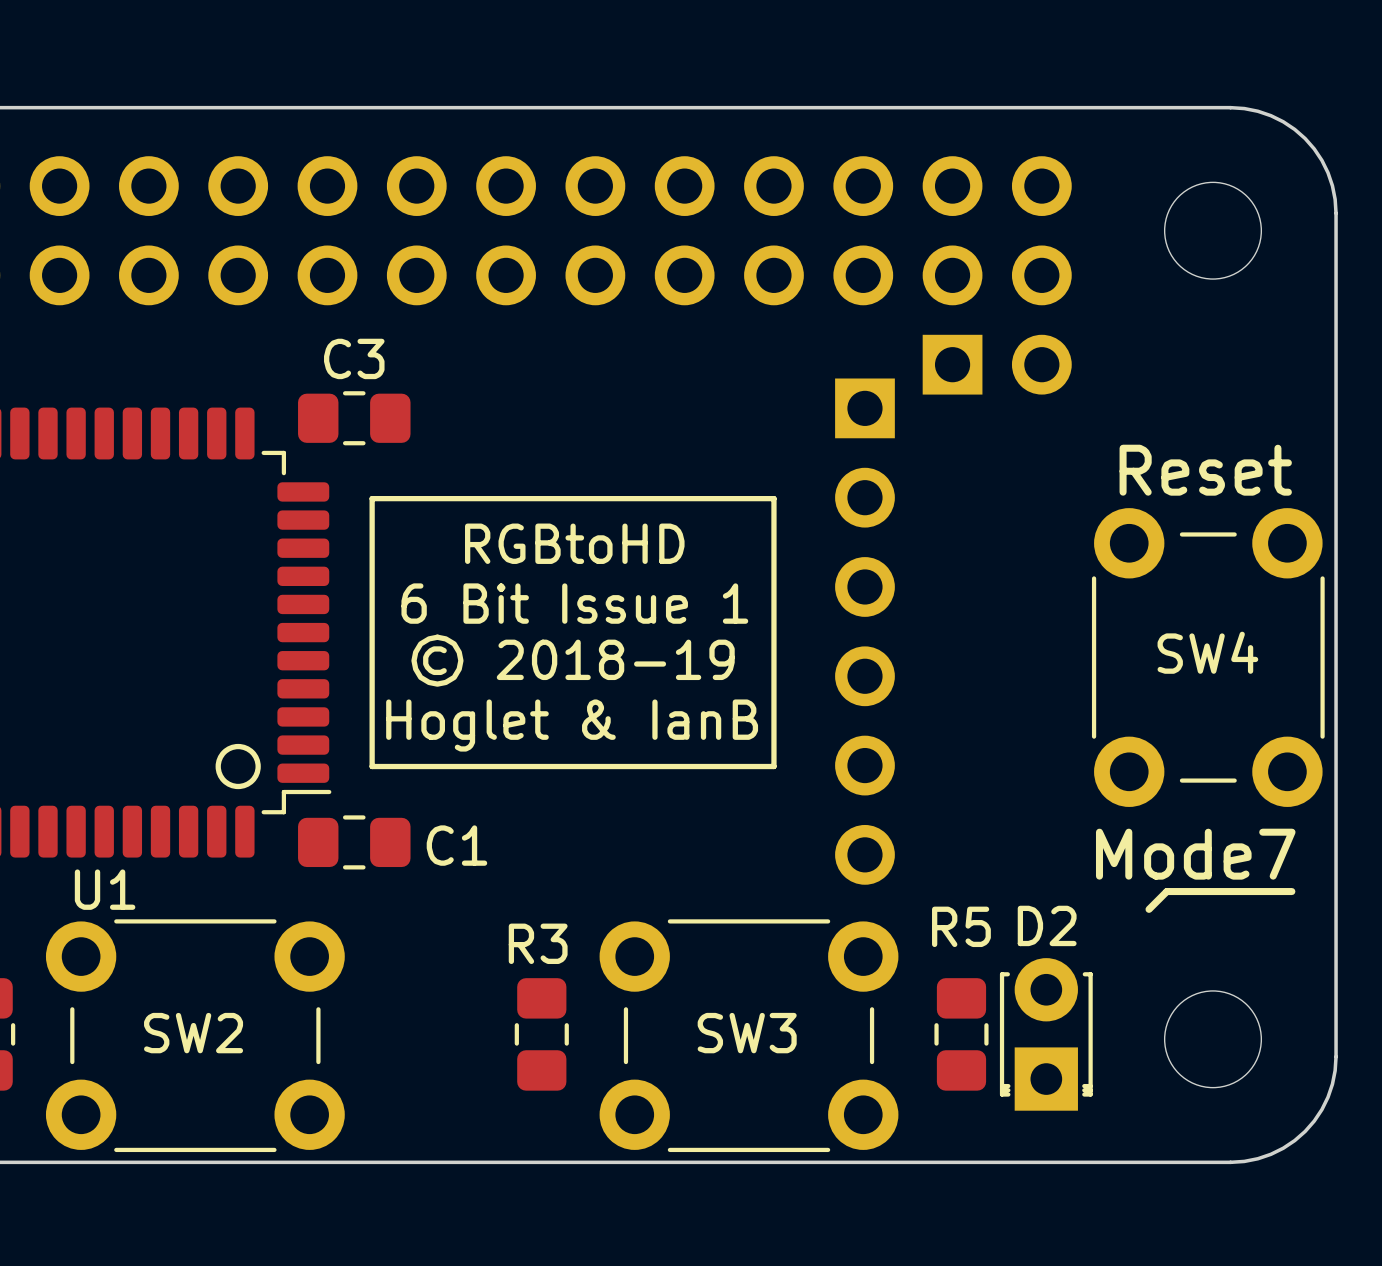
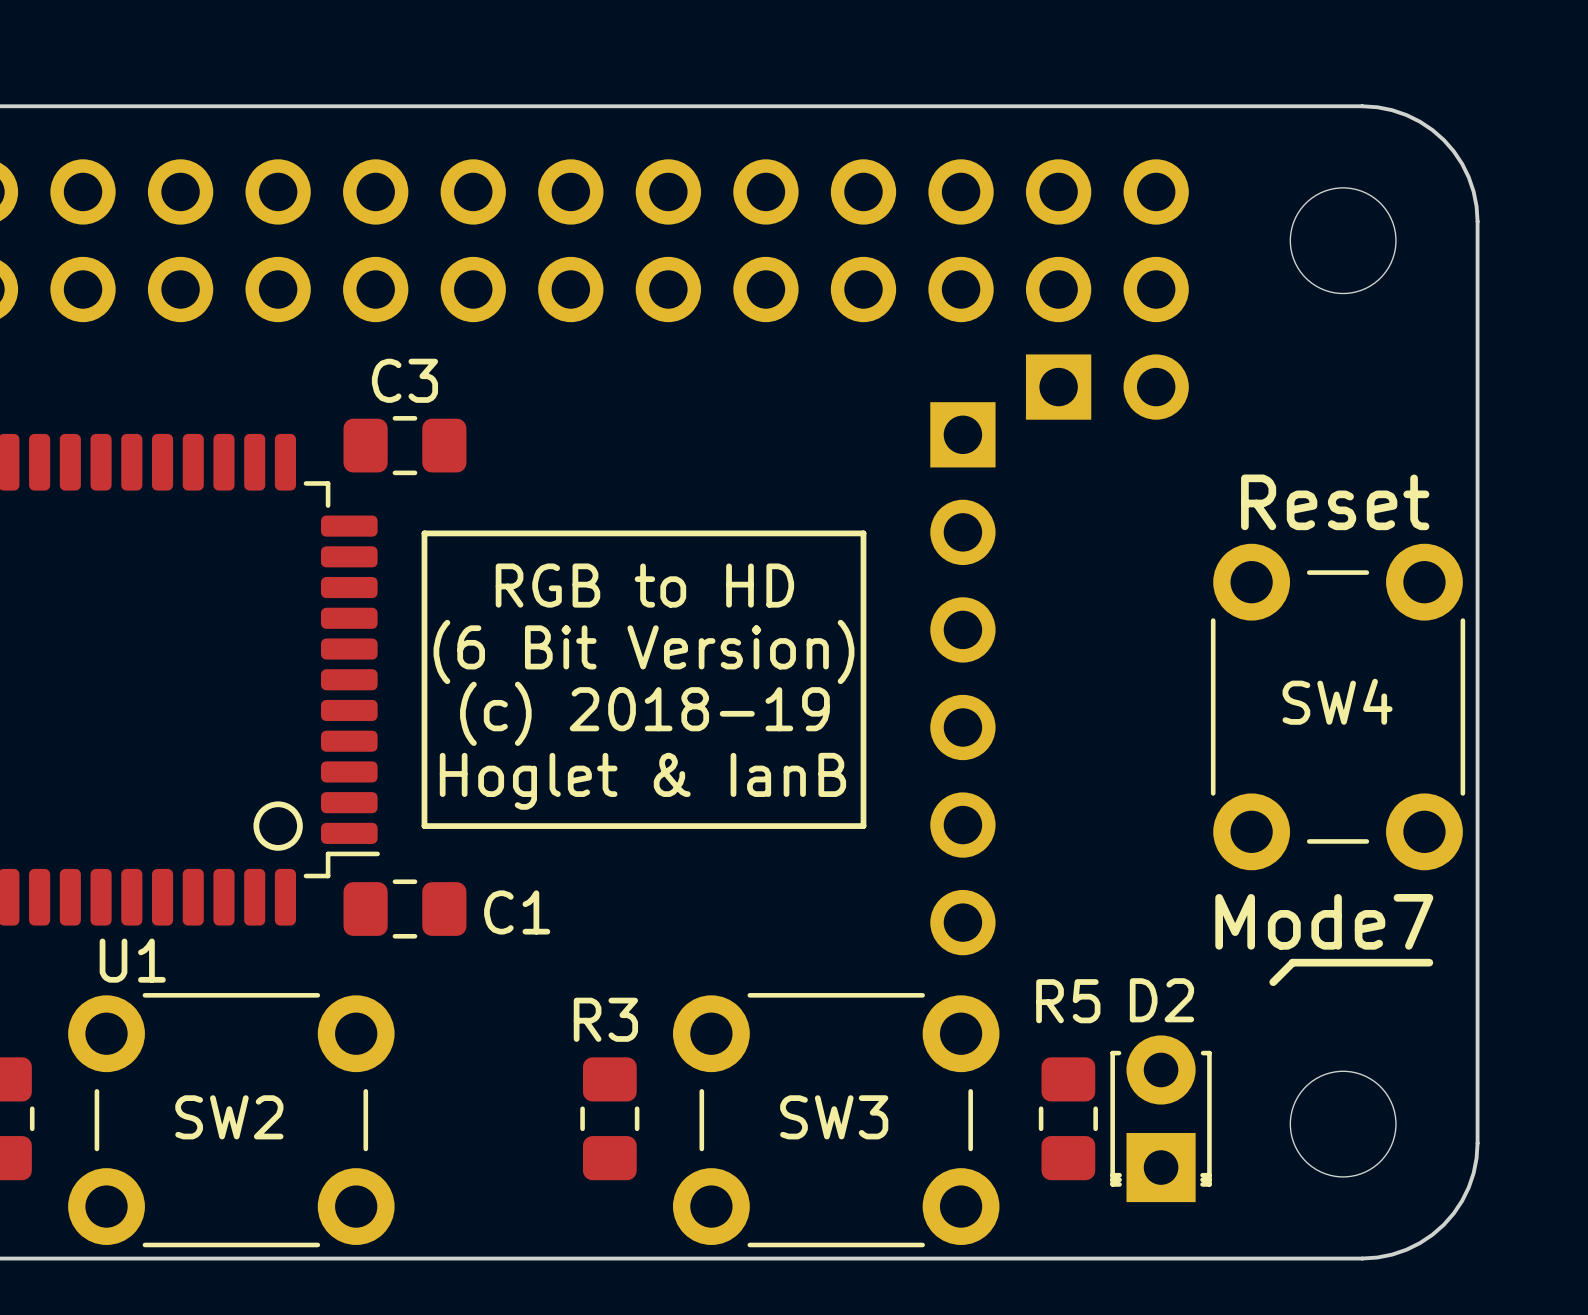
text: RGBtoHD (574, 543) -> RGB to HD (644, 585)
text: 6 Bit Issue 1 (574, 603) -> (6 Bit Version) (643, 651)
text: © 2018-19 (573, 660) -> (c) 2018-19 (644, 713)

